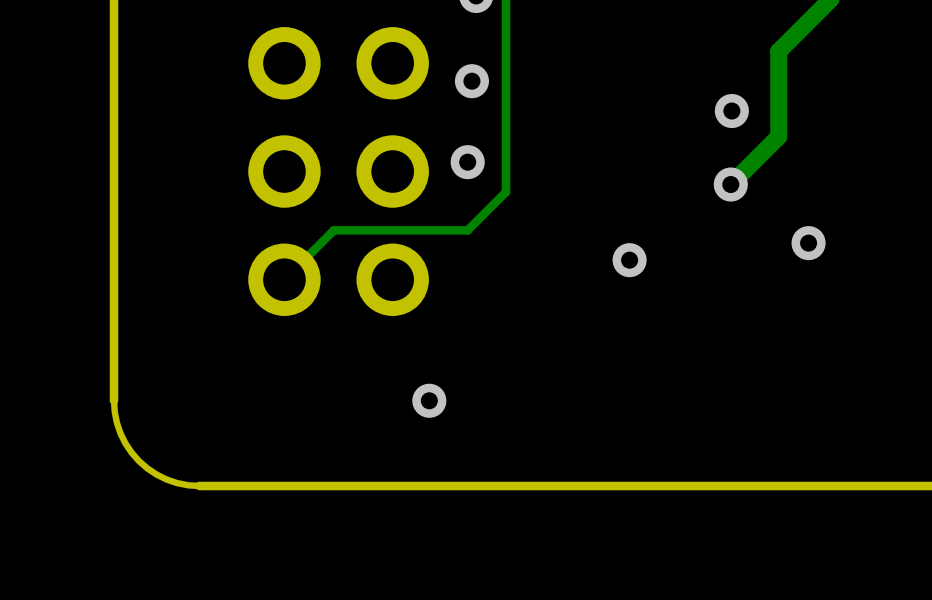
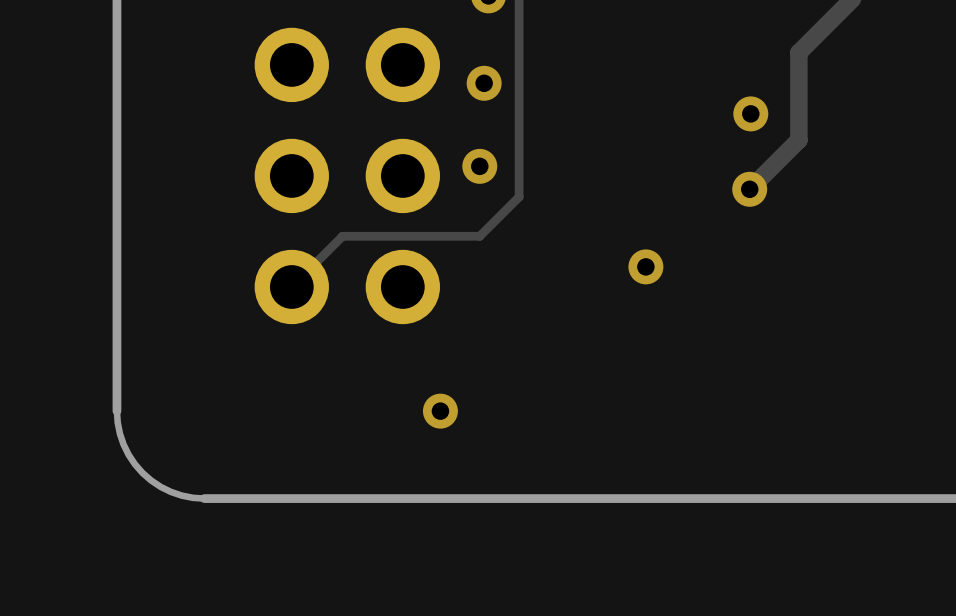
via: (808, 243) -> none

